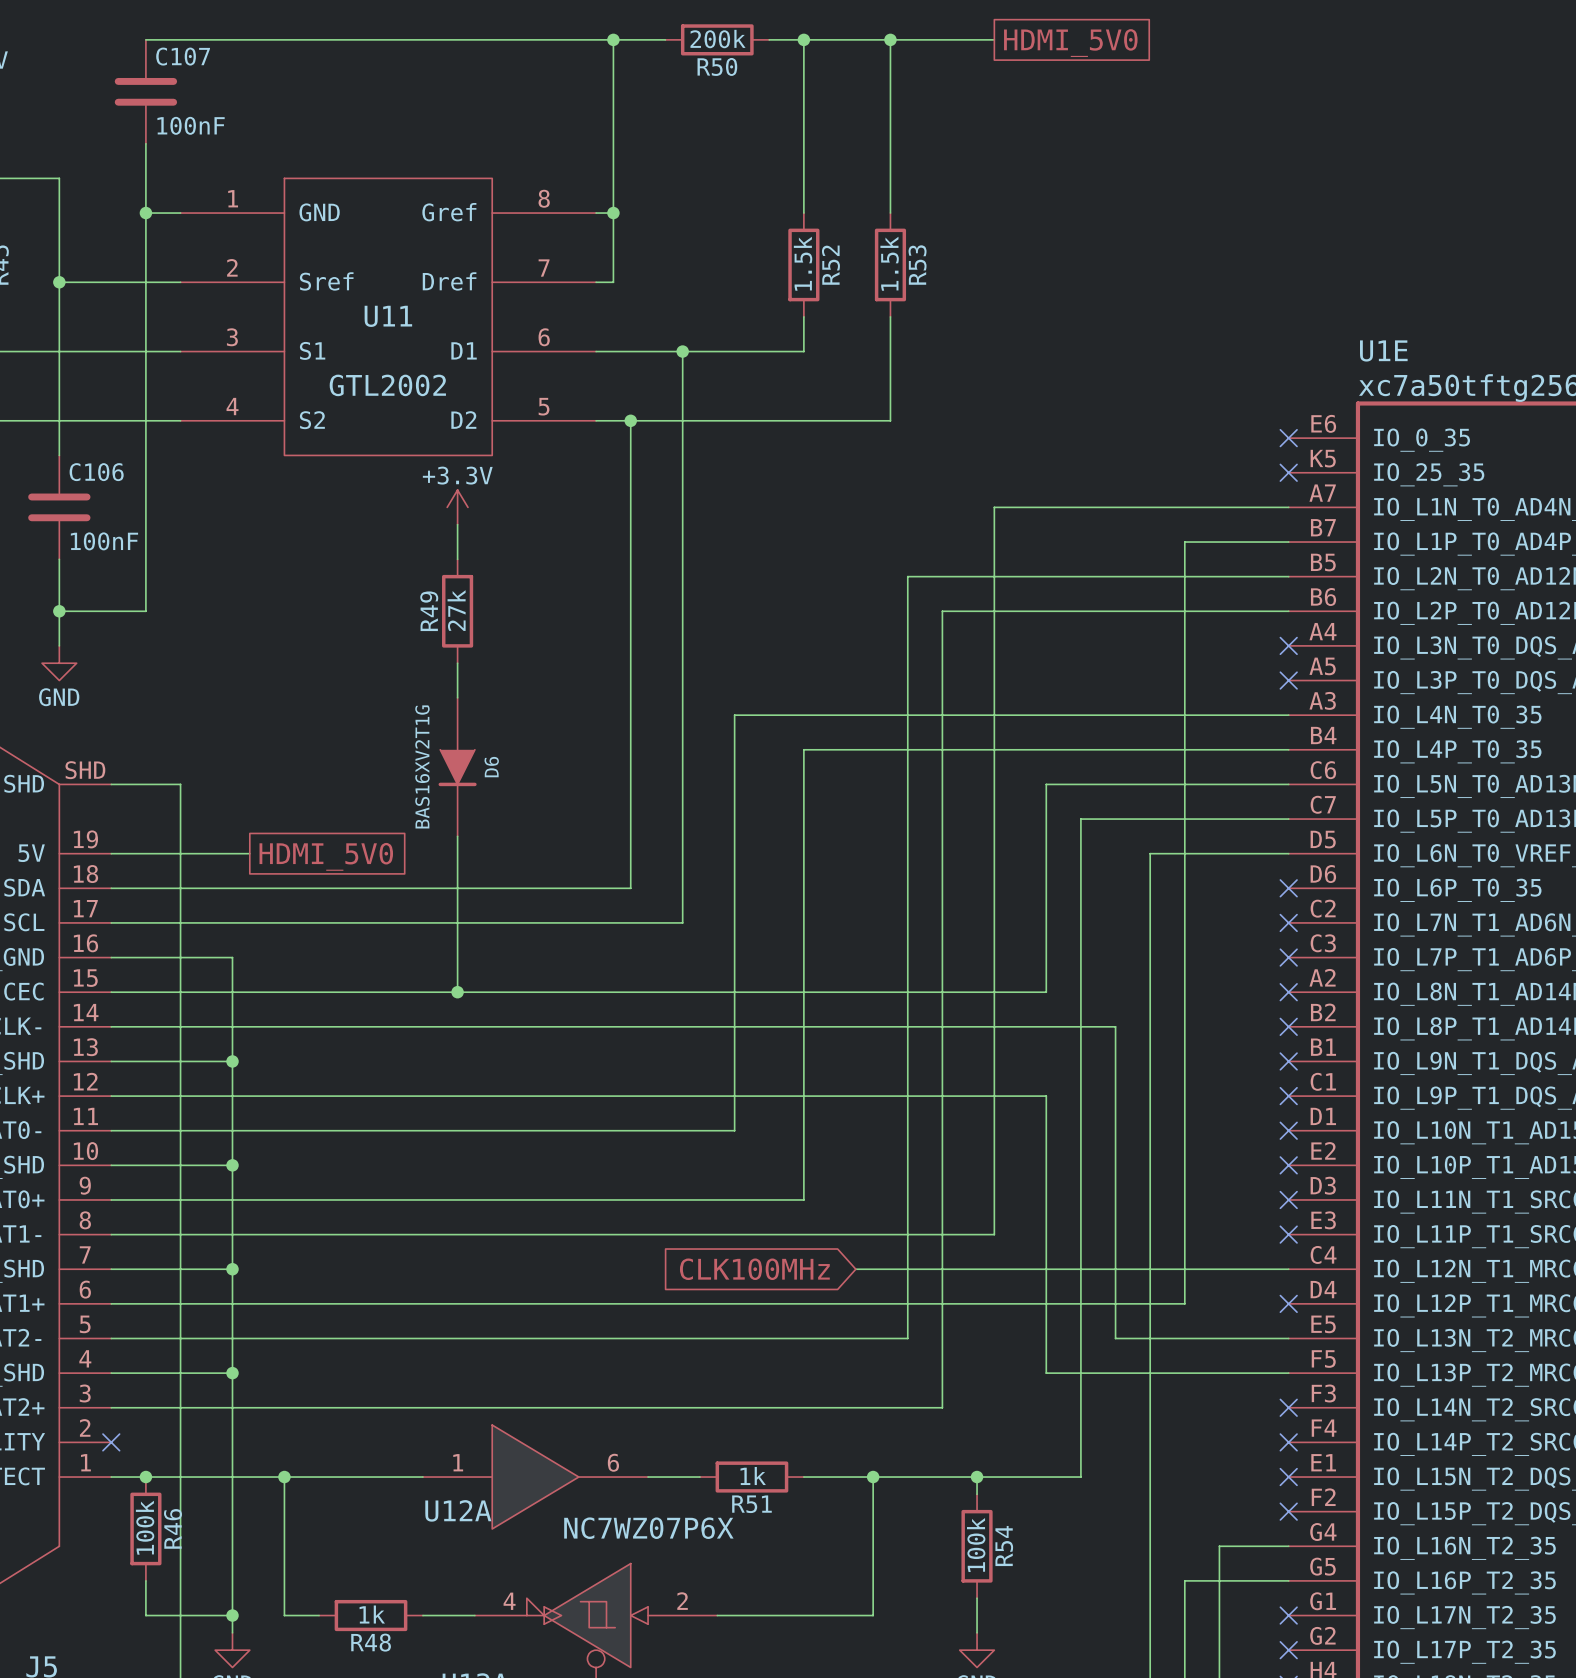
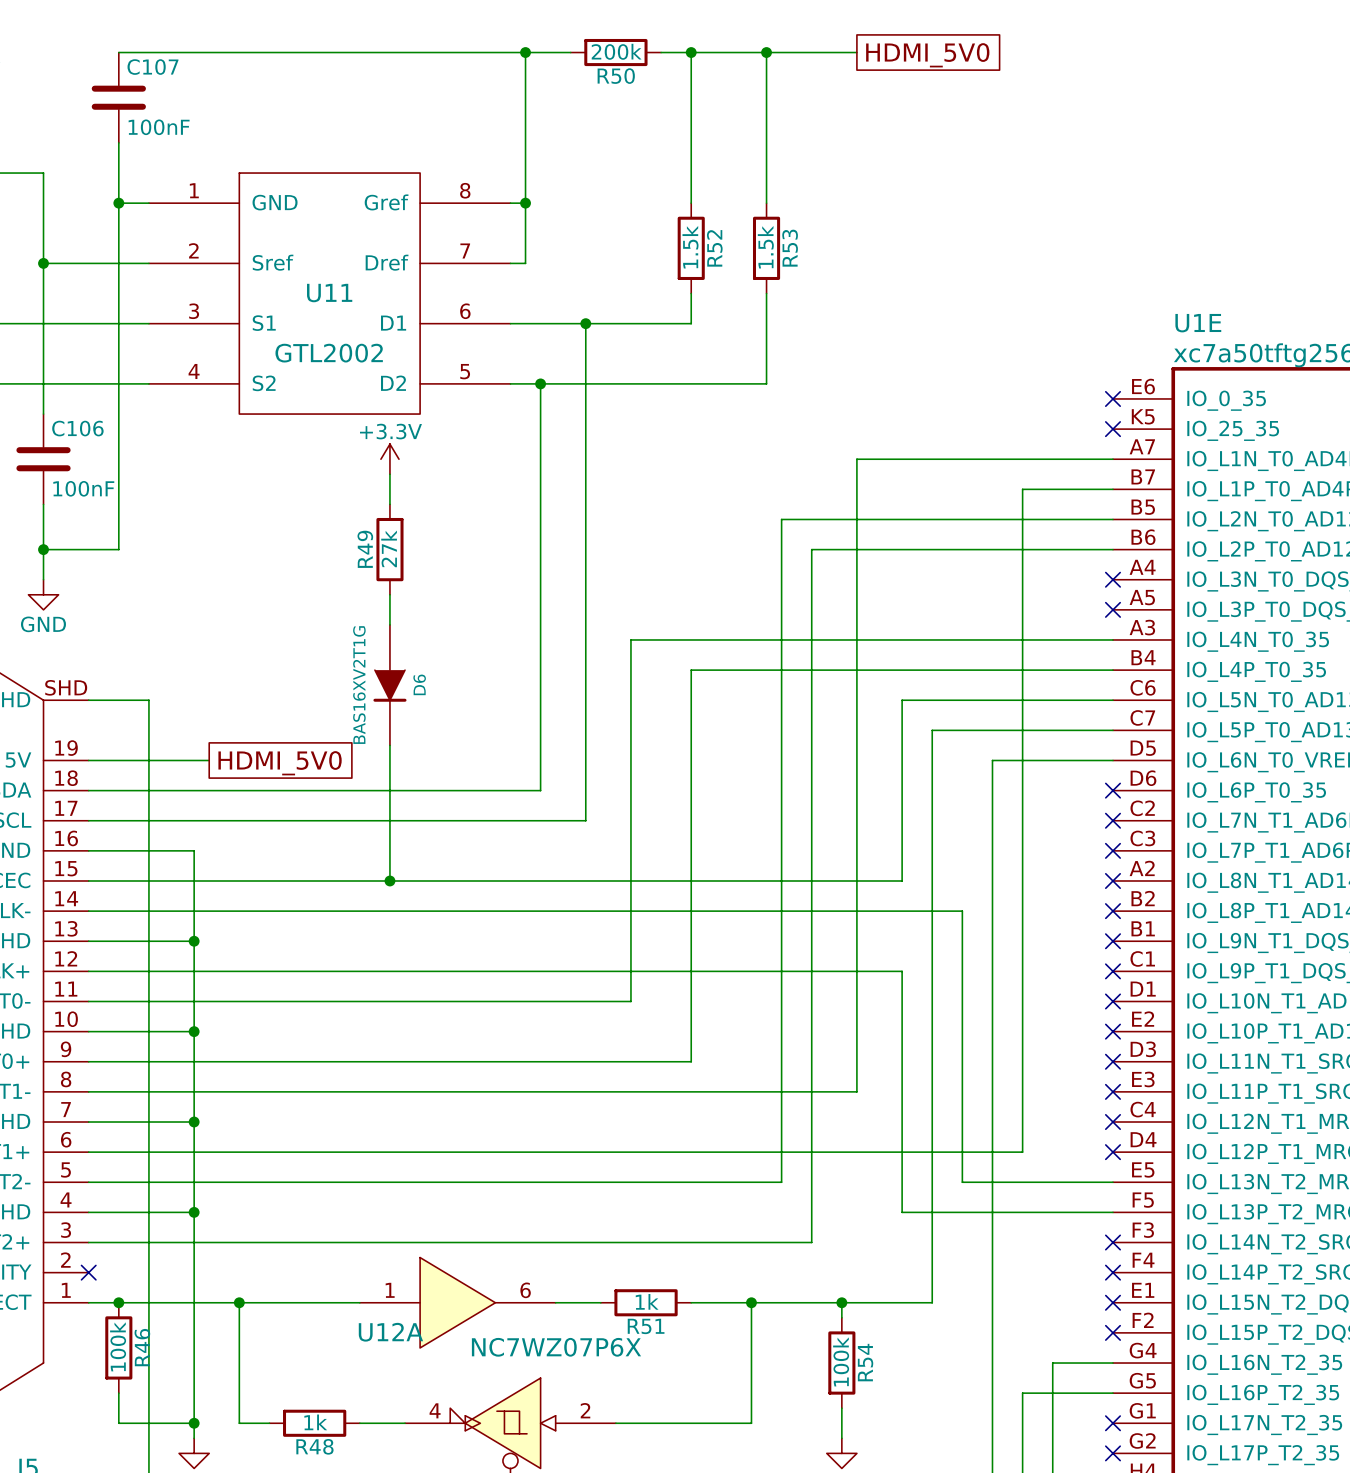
global label: CLK100MHz (754, 1269) -> none
wire: (855, 1269) (1288, 1269) -> none
no-connect mark: none -> (1112, 1122)

